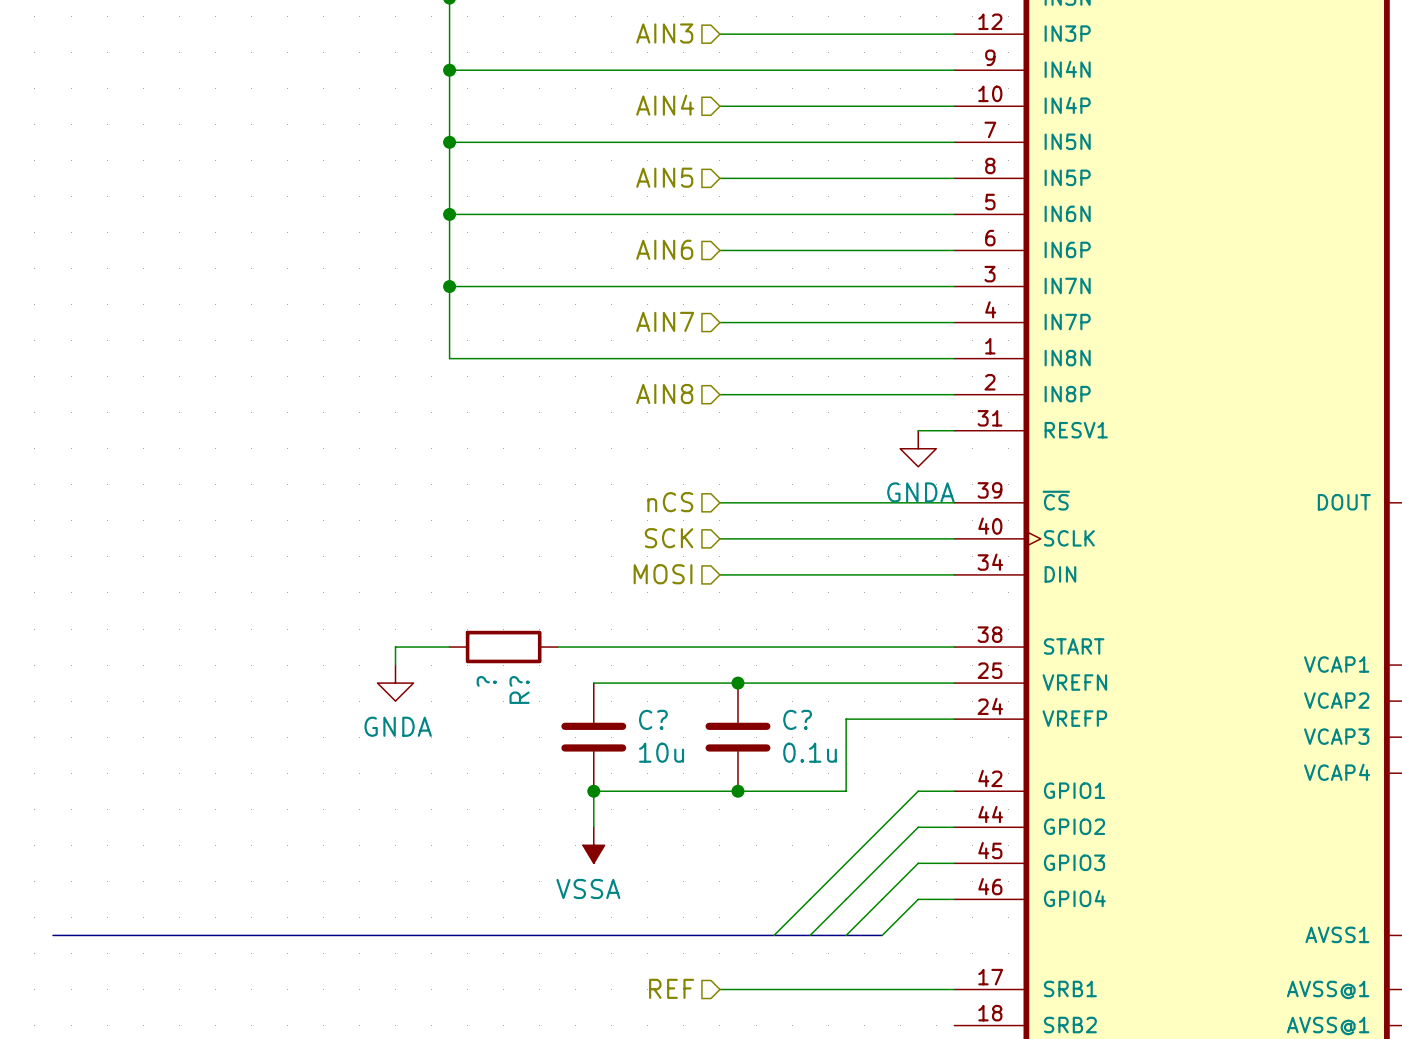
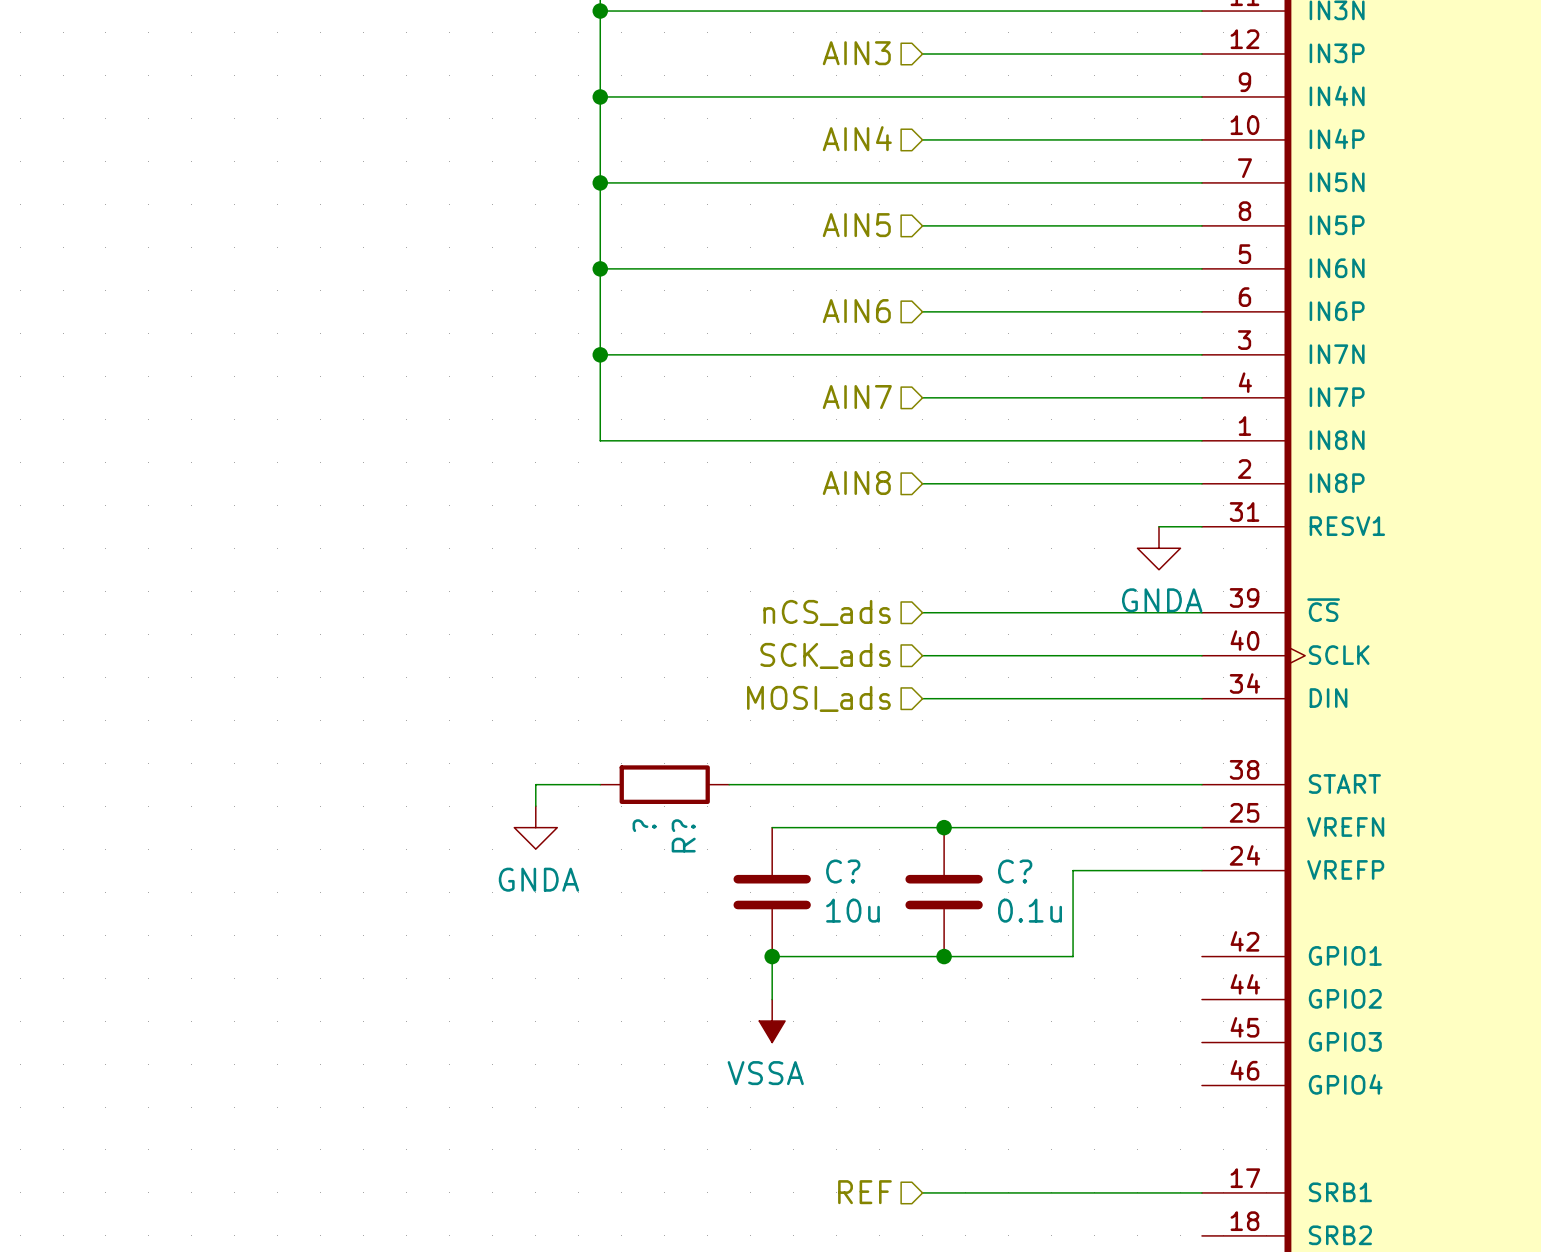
hierarchical label: nCS (670, 502) -> nCS_ads (827, 612)
hierarchical label: SCK (669, 538) -> SCK_ads (825, 655)
hierarchical label: MOSI (663, 574) -> MOSI_ads (818, 698)
wire: (954, 791) (918, 791) (774, 935) -> none
wire: (954, 827) (918, 827) (810, 935) -> none
wire: (954, 863) (918, 863) (846, 935) -> none
wire: (954, 899) (918, 899) (882, 935) -> none
bus: (53, 935) (882, 935) -> none

